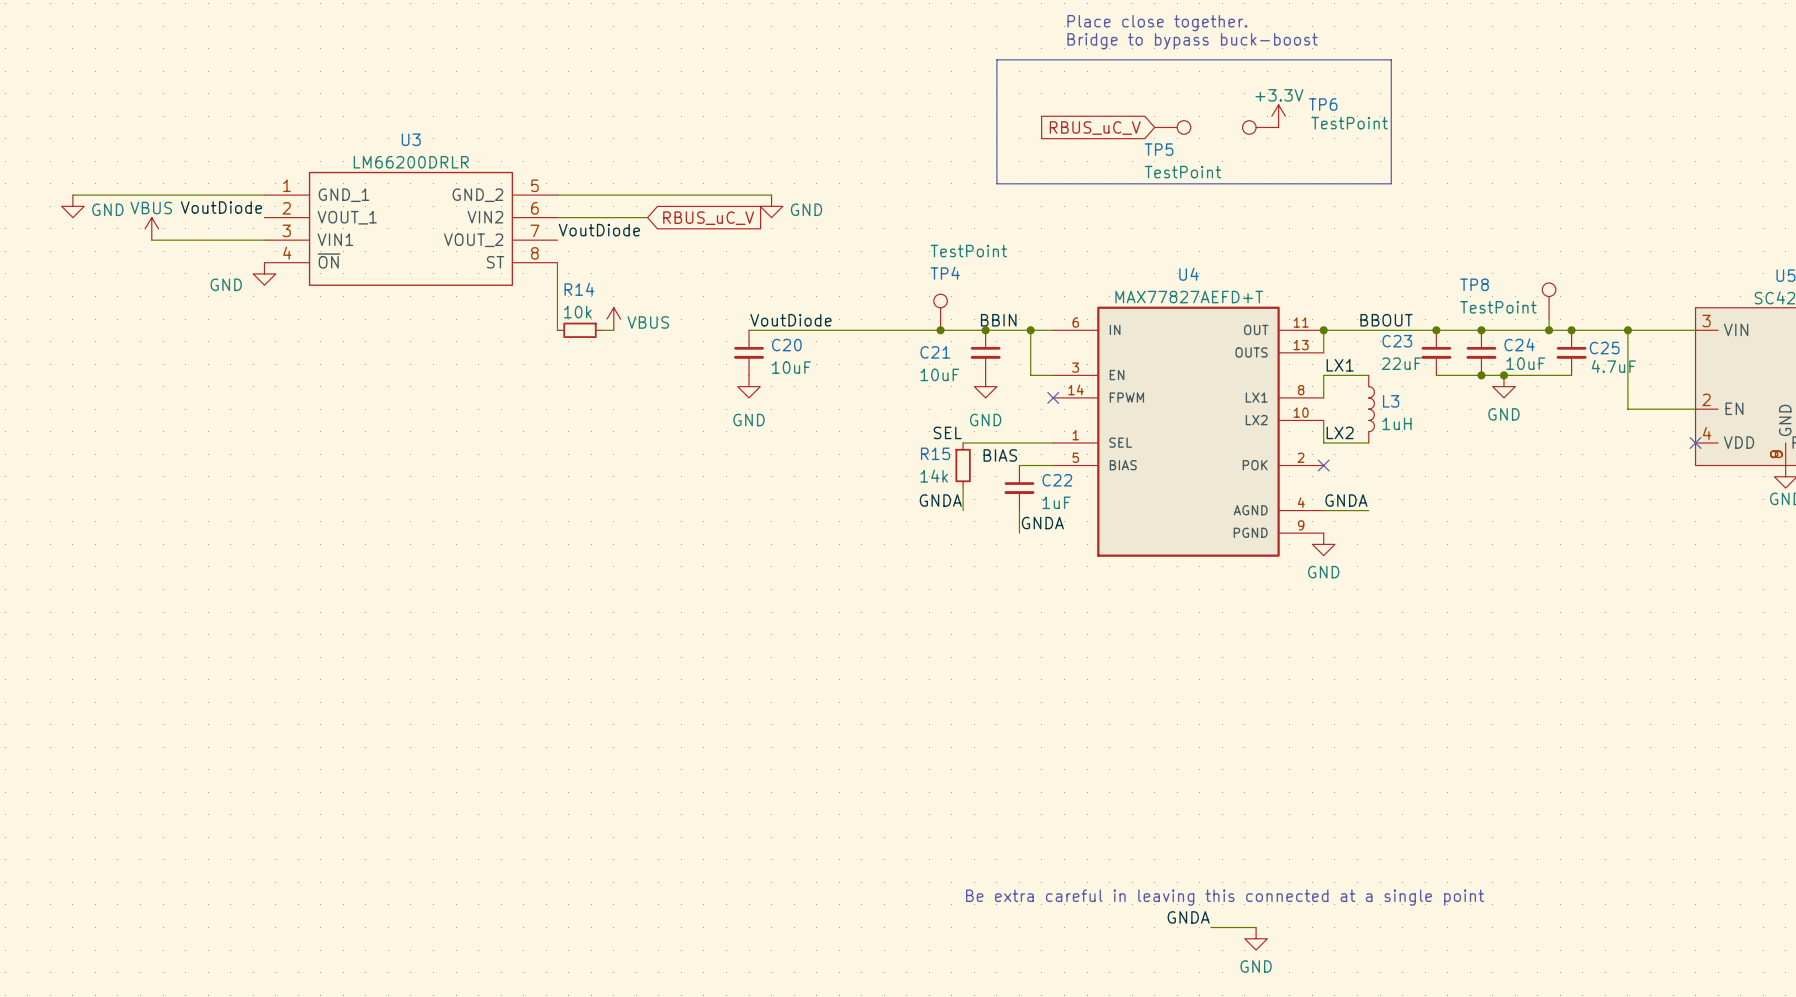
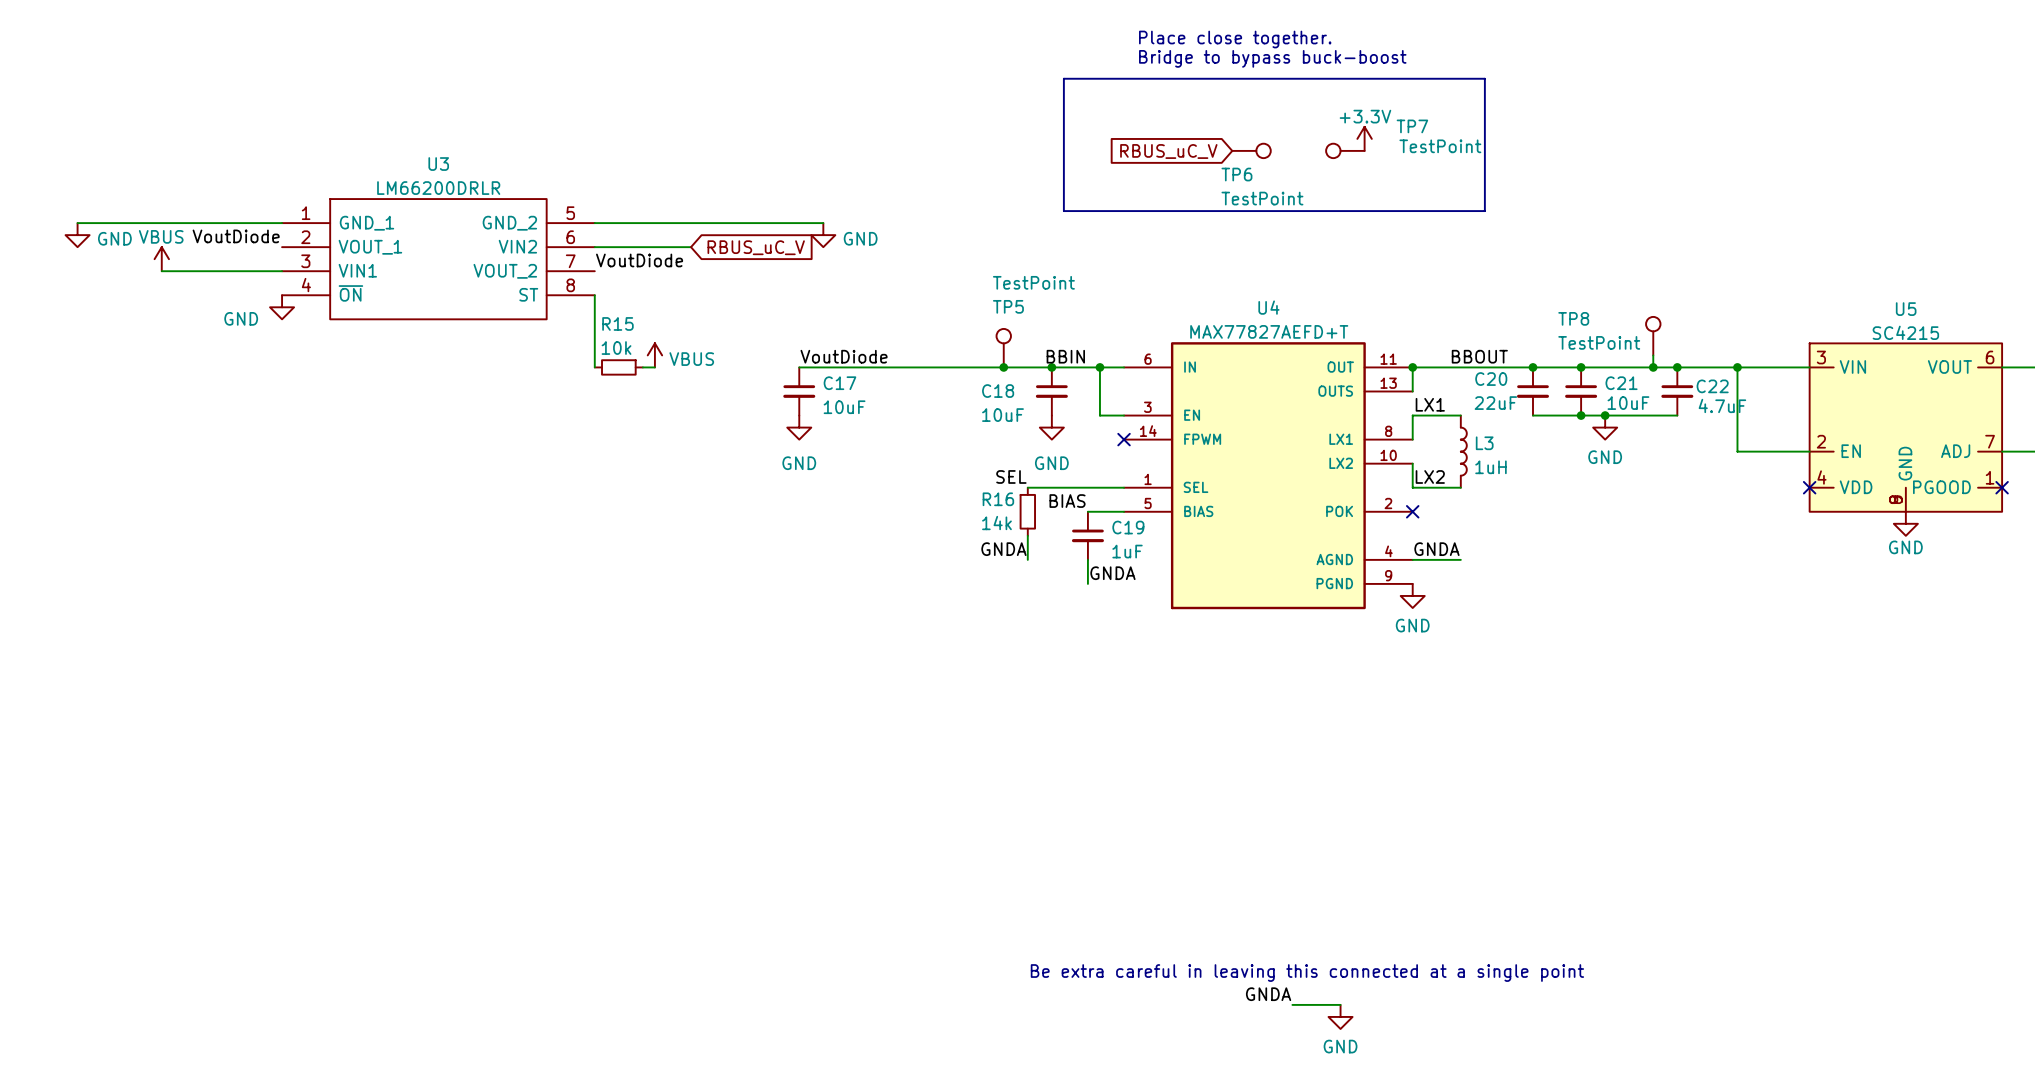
TP6 name: TP6 (1323, 104) -> TP7 (1412, 126)
TP5 name: TP5 (1159, 149) -> TP6 (1236, 174)
TP4 name: TP4 (945, 273) -> TP5 (1008, 306)
R14 name: R14 (579, 289) -> R15 (617, 323)
C23 name: C23 (1397, 341) -> C20 (1491, 379)
C24 name: C24 (1519, 344) -> C21 (1621, 383)
C20 name: C20 (786, 345) -> C17 (839, 383)
C25 name: C25 (1604, 348) -> C22 (1712, 386)
C21 name: C21 (935, 352) -> C18 (998, 391)
R15 name: R15 (935, 453) -> R16 (998, 499)
C22 name: C22 (1057, 480) -> C19 (1128, 527)

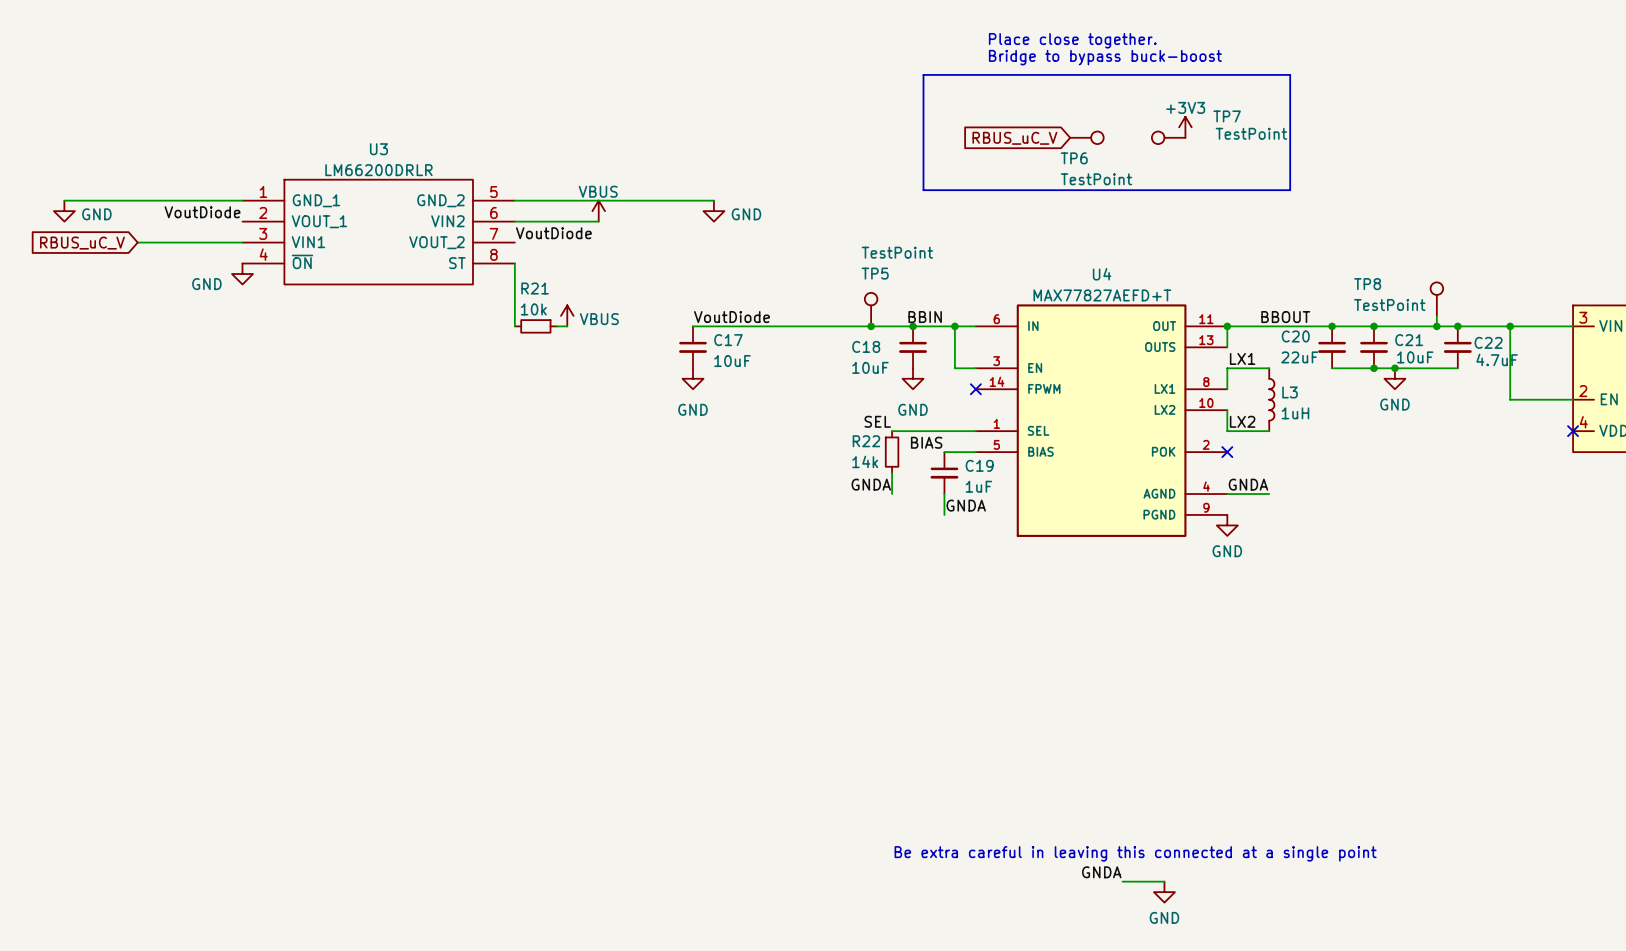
power symbol: +3.3V (1364, 138) -> +3V3 (1185, 127)
power symbol: none -> VBUS (598, 211)
global label: RBUS_uC_V (756, 247) -> none
power symbol: VBUS (161, 259) -> none
global label: none -> RBUS_uC_V (82, 243)
R15 name: R15 (617, 323) -> R21 (535, 288)
R16 name: R16 (998, 499) -> R22 (866, 441)

